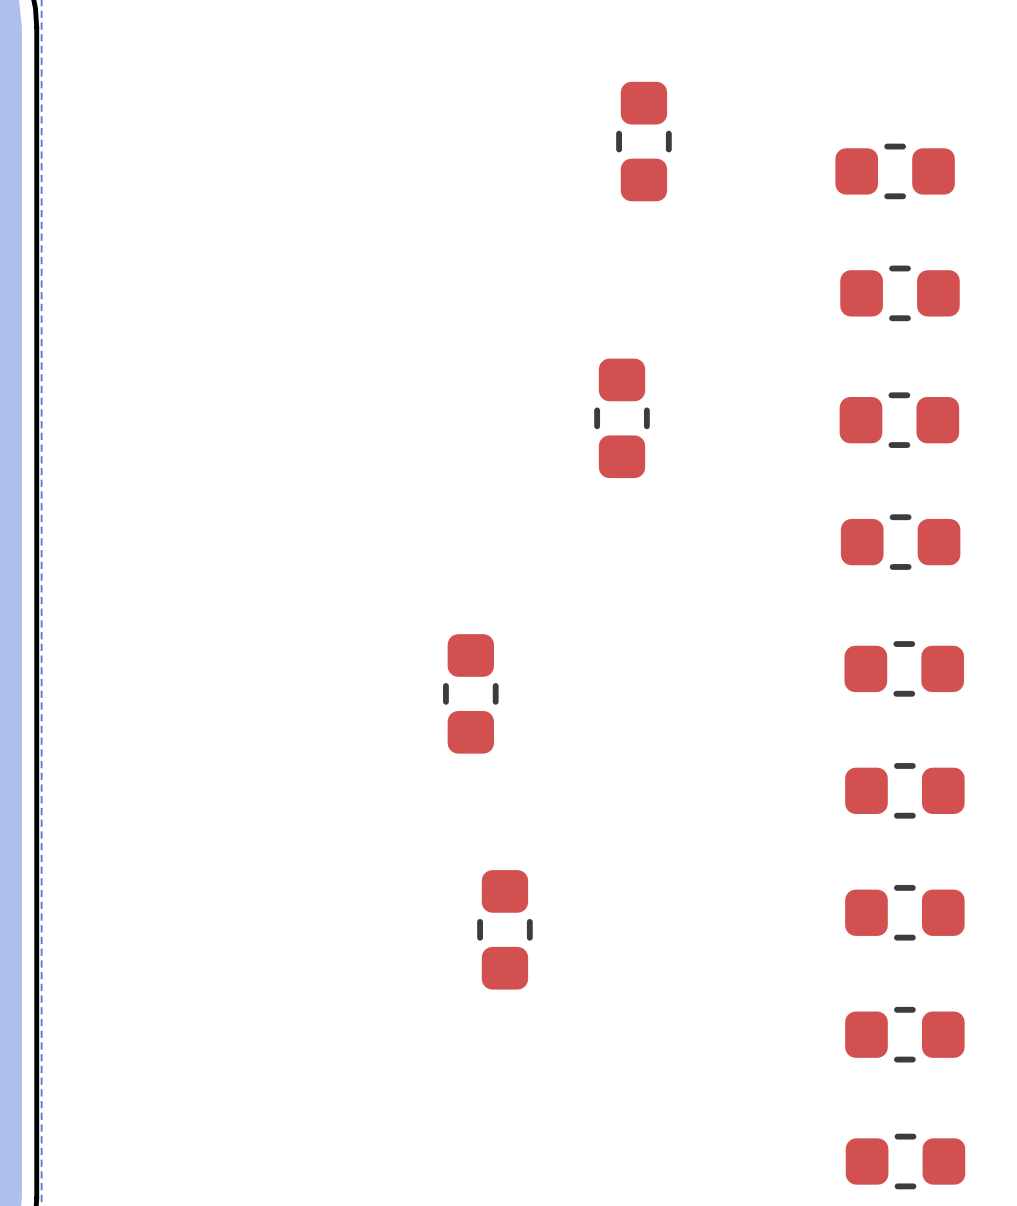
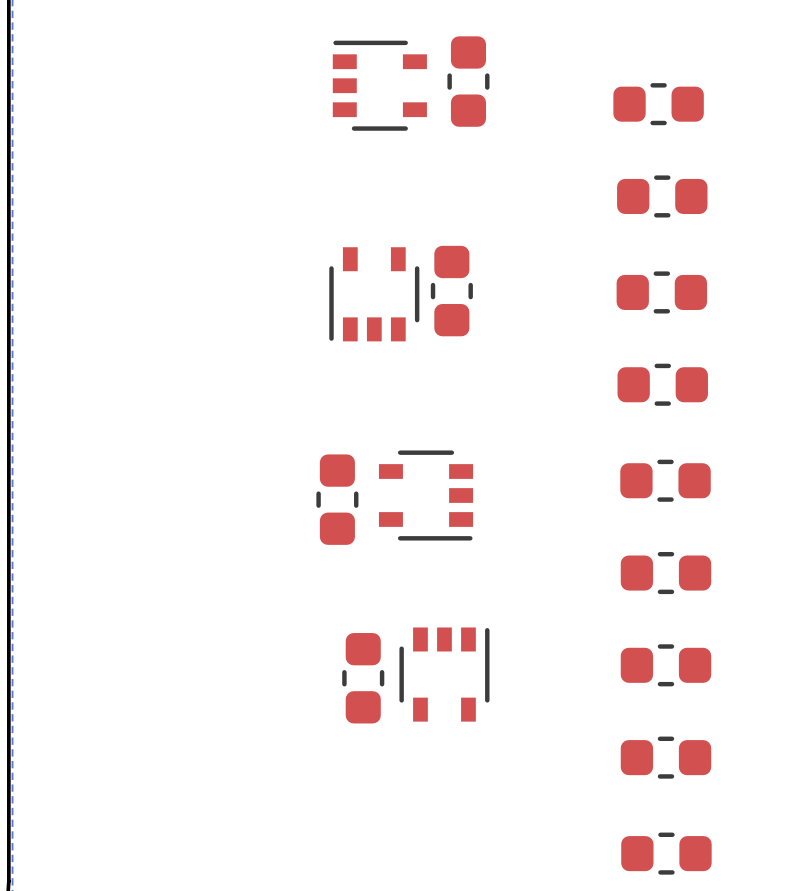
part: none -> (379, 85)
part: none -> (374, 294)
part: none -> (426, 495)
part: none -> (444, 674)

